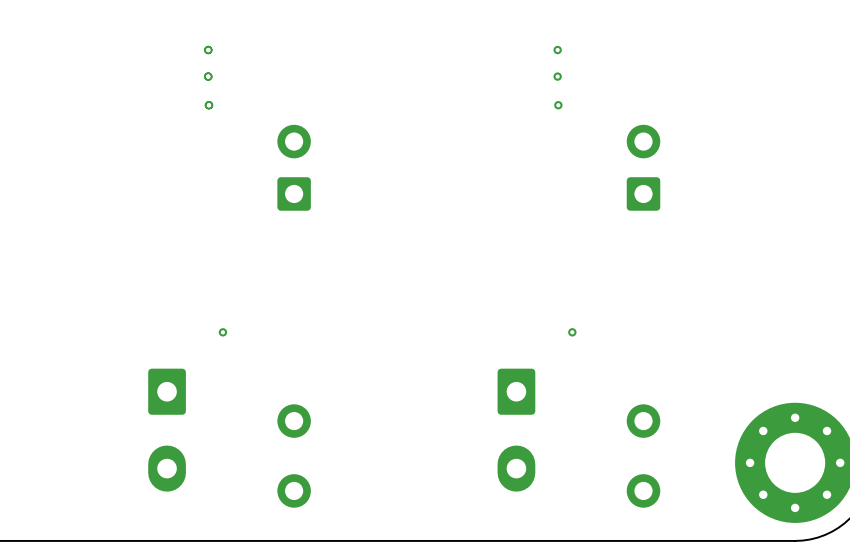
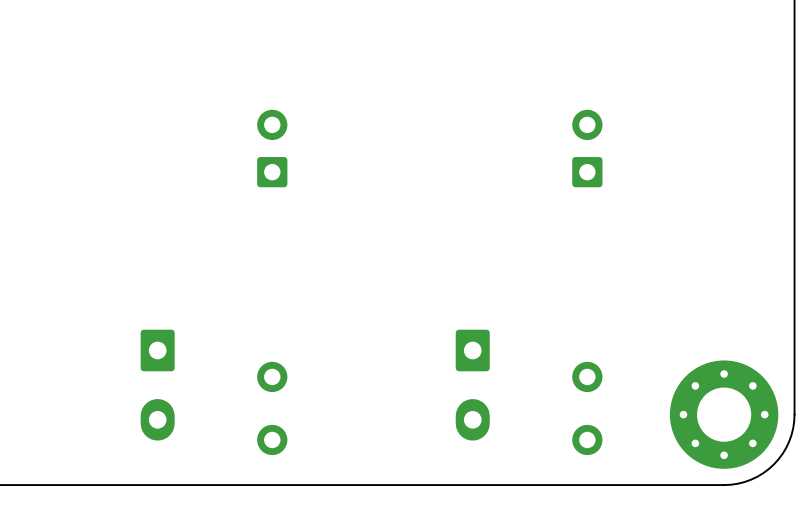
via: (208, 50) -> none
via: (557, 50) -> none
via: (208, 76) -> none
via: (557, 76) -> none
via: (208, 105) -> none
via: (558, 105) -> none
via: (222, 332) -> none
via: (572, 332) -> none

